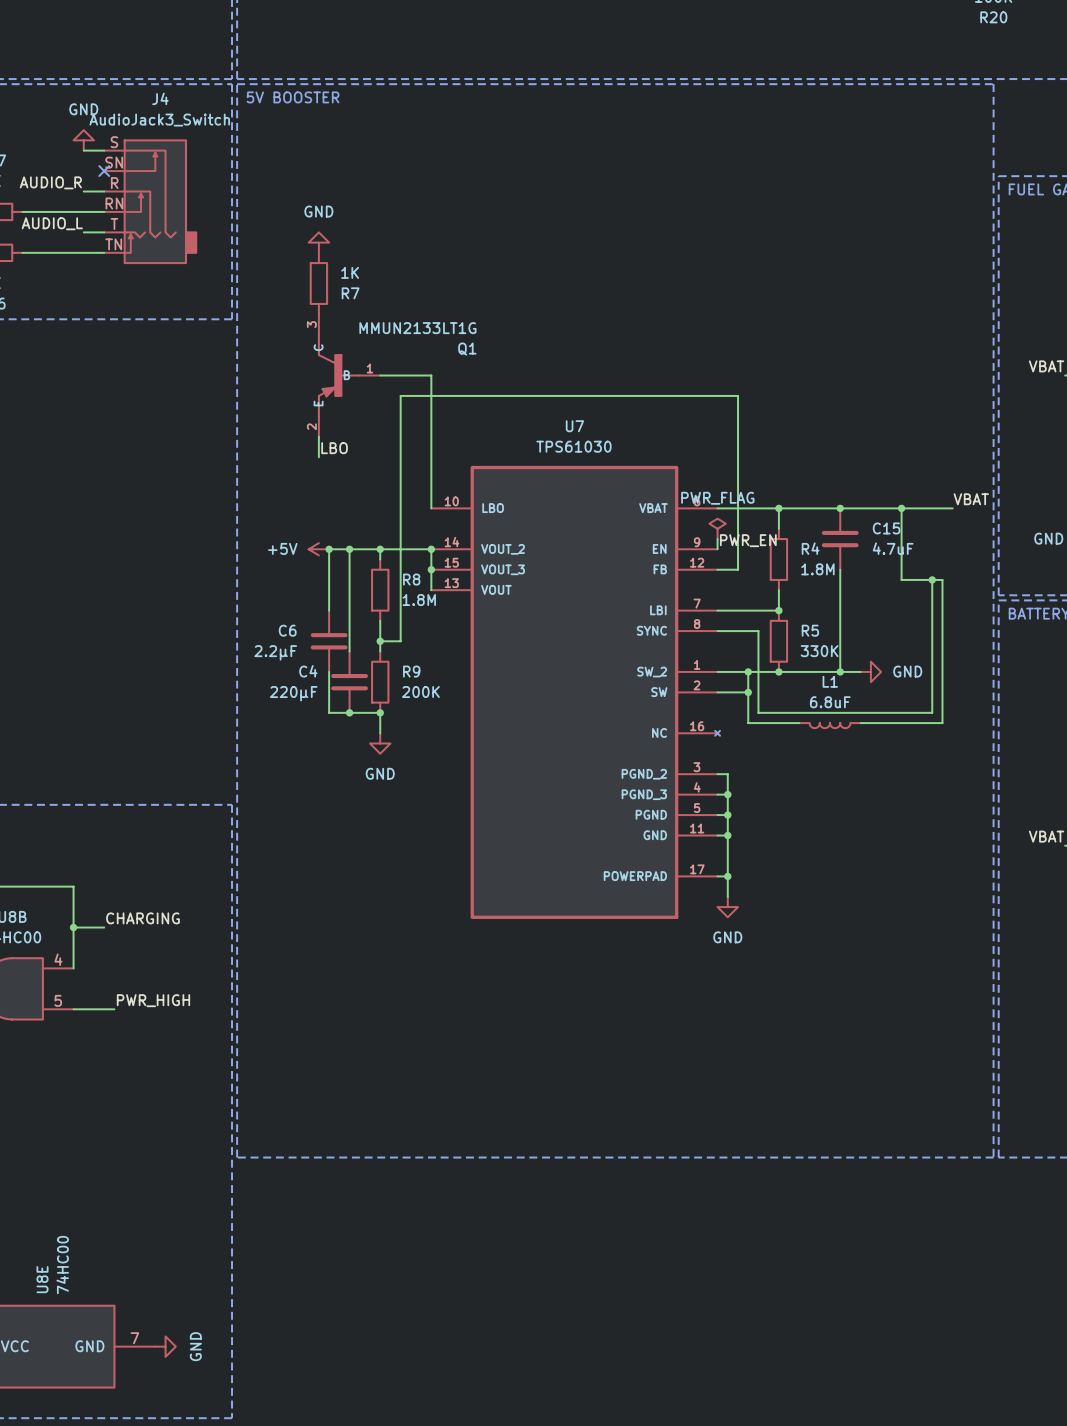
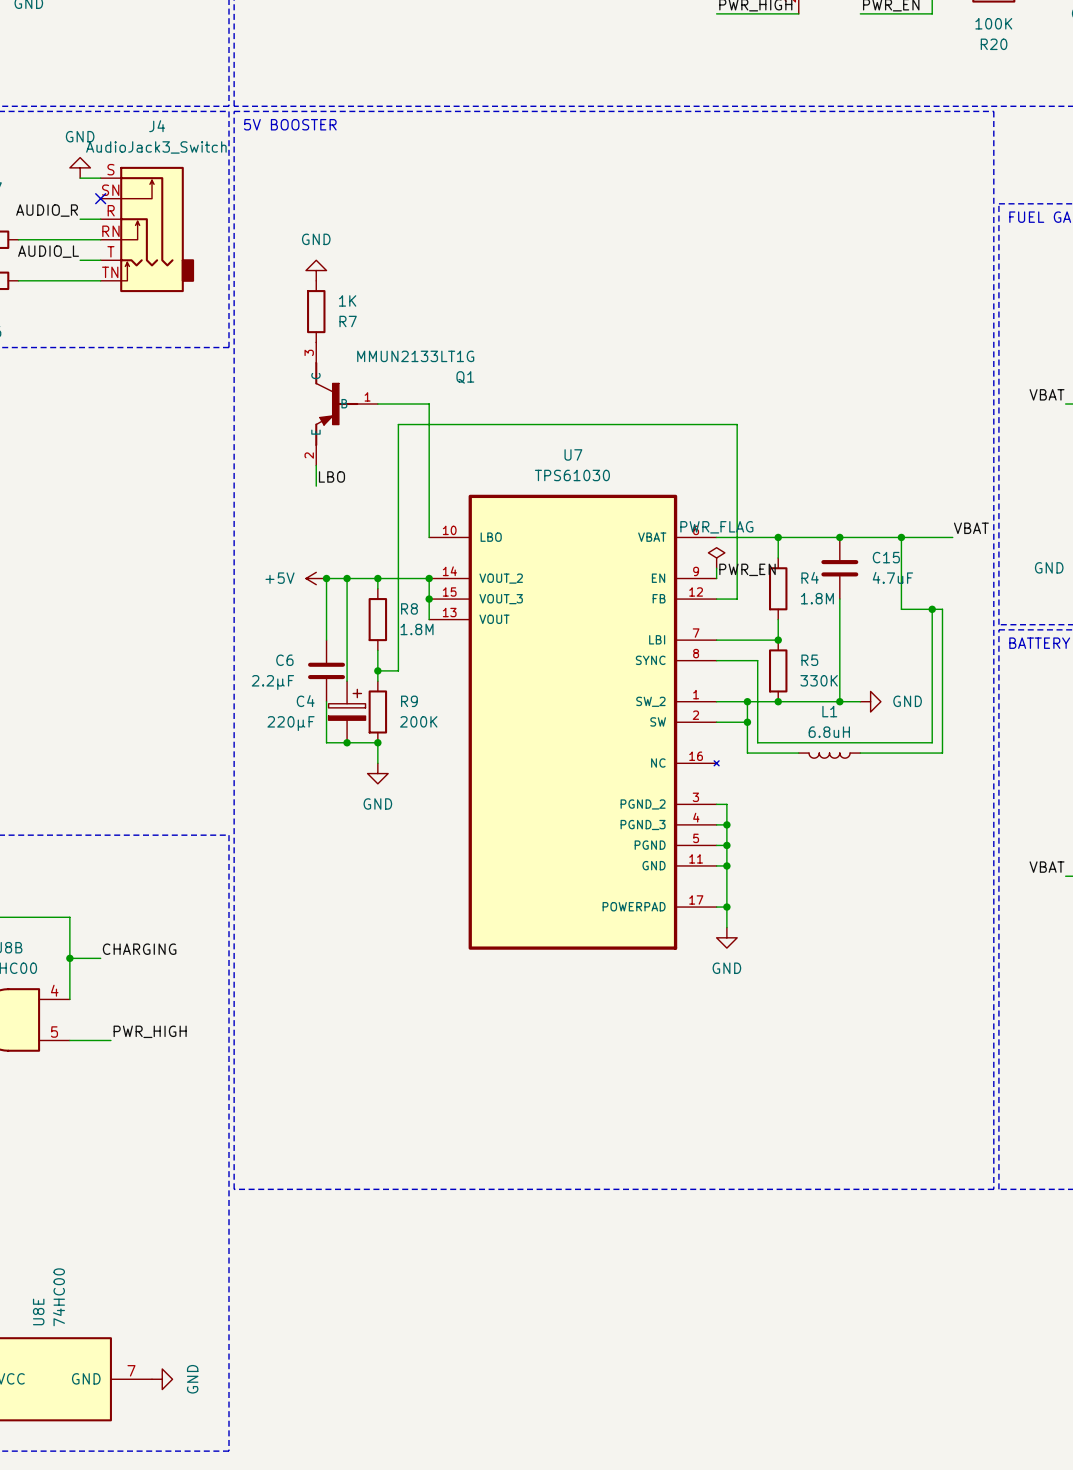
C4 symbol: [331, 651, 368, 713] -> [328, 681, 366, 743]
L1 value: 6.8uF (830, 702) -> 6.8uH (829, 732)

